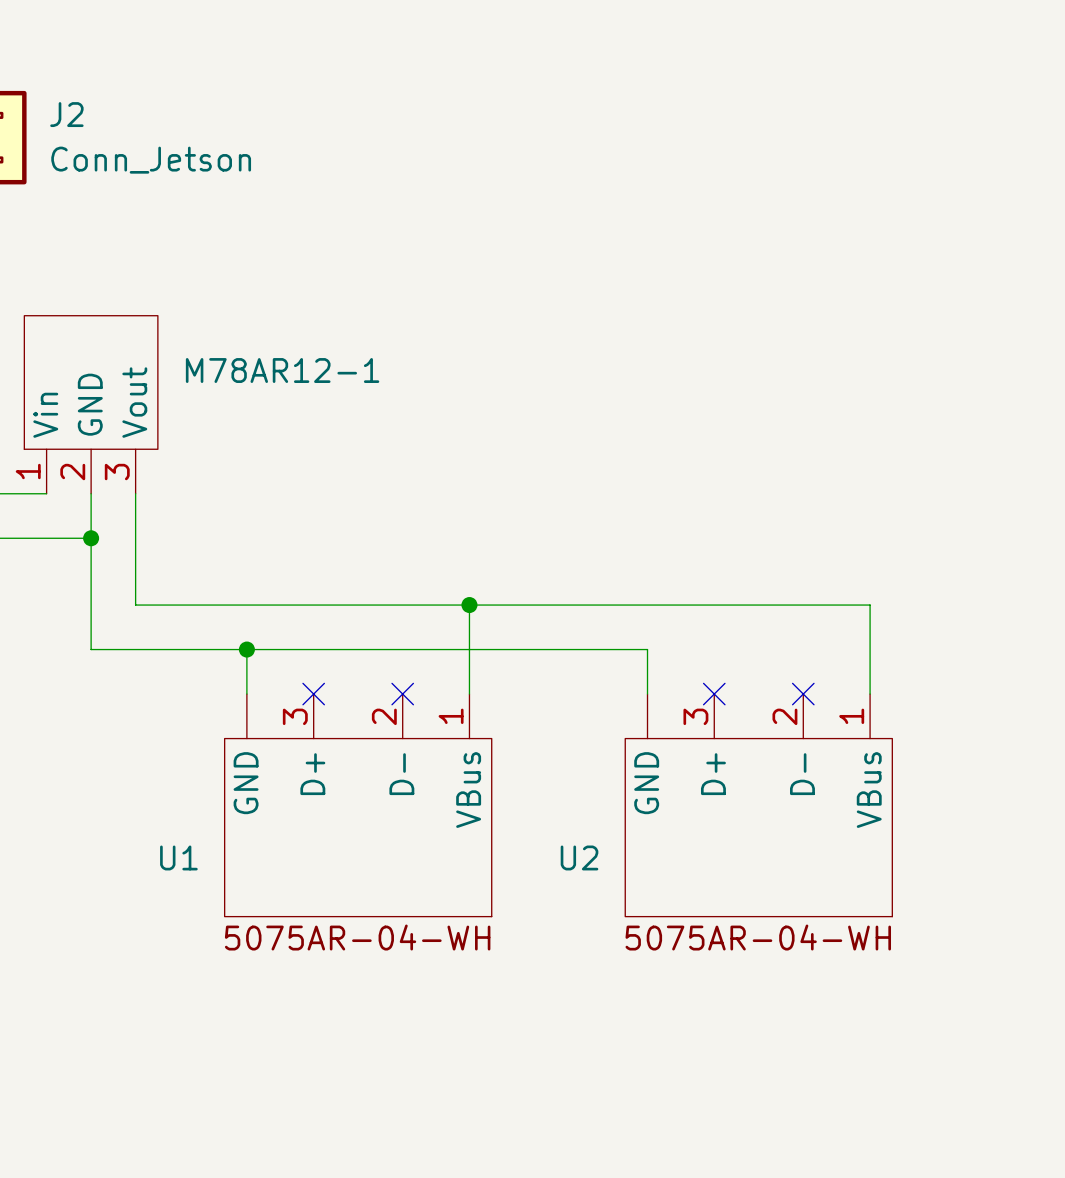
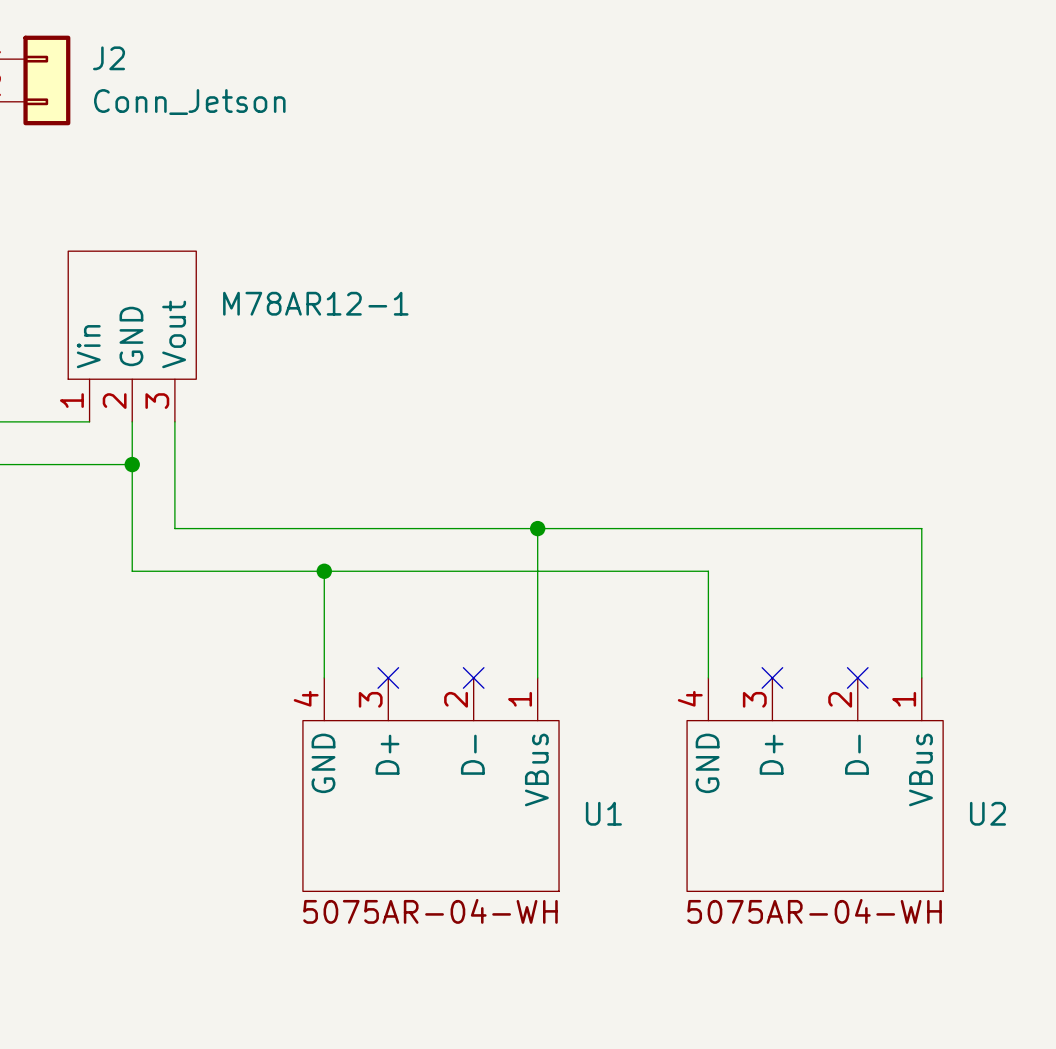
wire: (469, 605) (469, 694) -> none
junction position: (469, 605) -> (537, 528)
wire: none -> (537, 528) (537, 677)
wire: (870, 605) (870, 694) -> (879, 528) (921, 528) (921, 677)
wire: (246, 649) (246, 694) -> none
junction position: (246, 649) -> (324, 571)
wire: none -> (324, 571) (324, 677)
wire: (647, 649) (647, 694) -> (665, 571) (708, 571) (708, 677)
no-connect mark: (313, 694) -> none
no-connect mark: (402, 694) -> none
no-connect mark: (714, 694) -> none
no-connect mark: (803, 694) -> none
no-connect mark: none -> (388, 677)
no-connect mark: none -> (473, 677)
no-connect mark: none -> (772, 677)
no-connect mark: none -> (857, 677)
U1 pin number: none -> 4 (306, 698)
U2 pin number: none -> 4 (690, 698)
U1 position: (358, 805) -> (430, 784)
U2 position: (758, 805) -> (815, 784)
U1 name position: U1 (178, 857) -> U1 (603, 813)
U2 name position: U2 (579, 857) -> U2 (987, 813)

